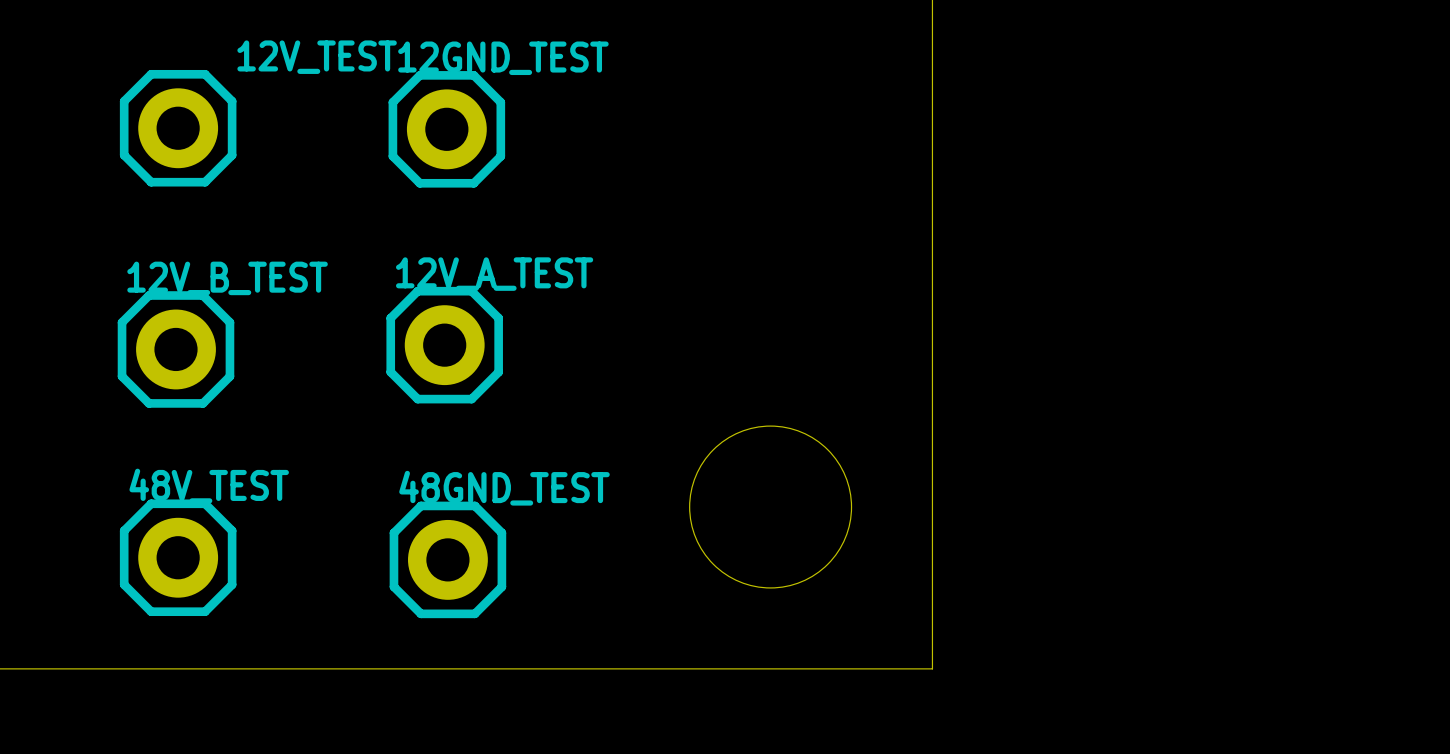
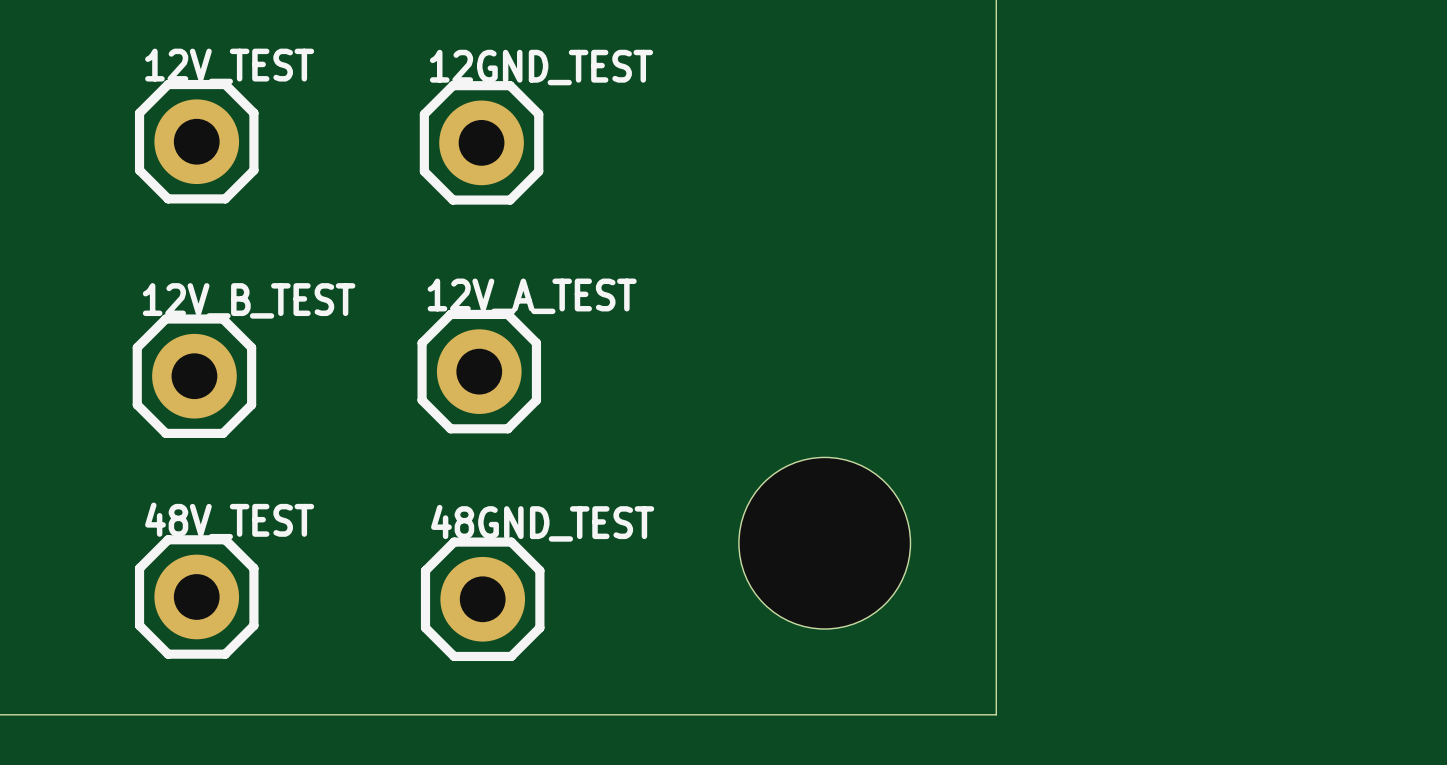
12V_TEST name position: 12V_TEST (317, 57) -> 12V_TEST (229, 66)

